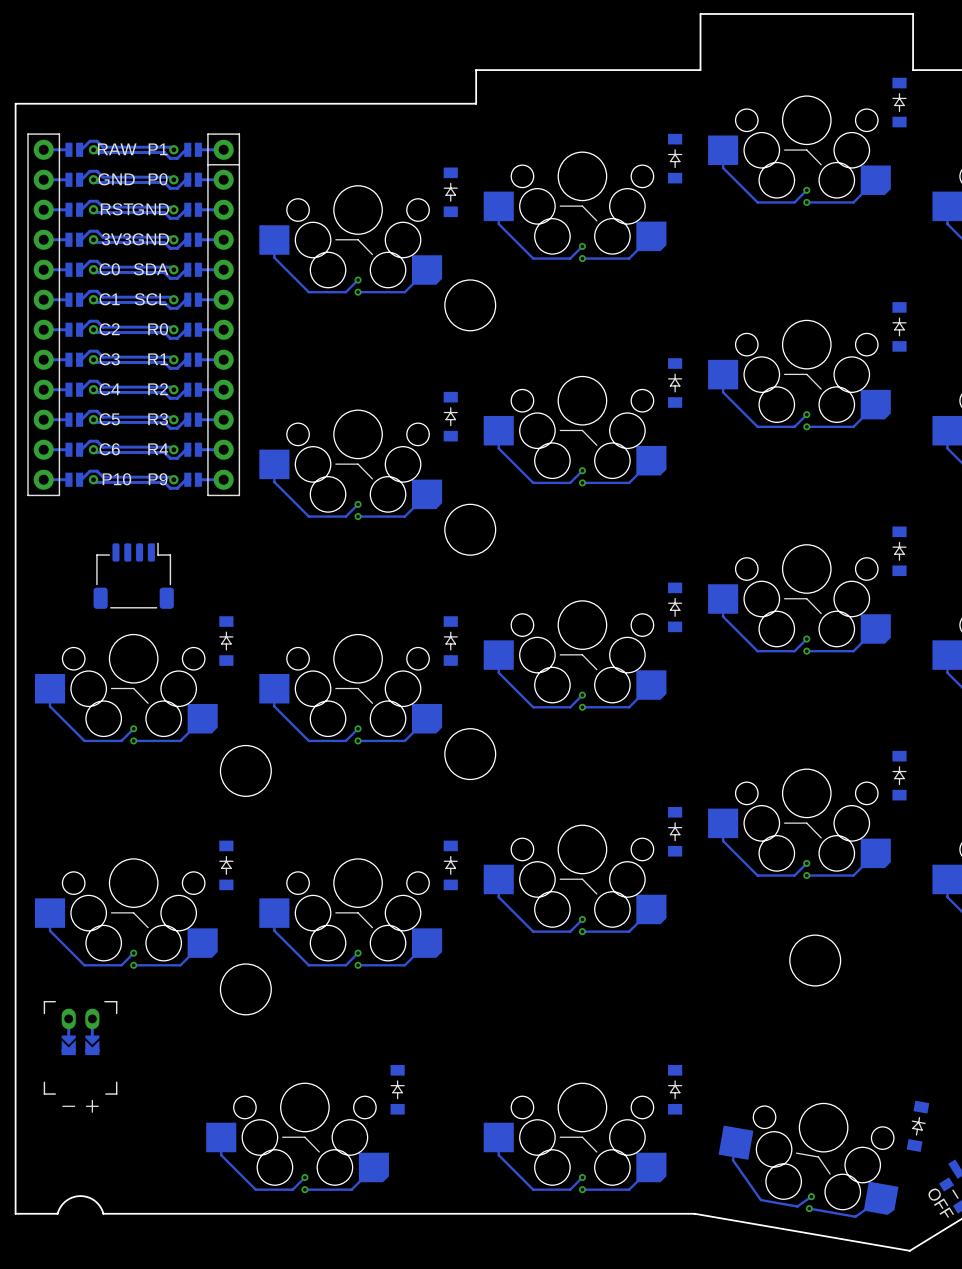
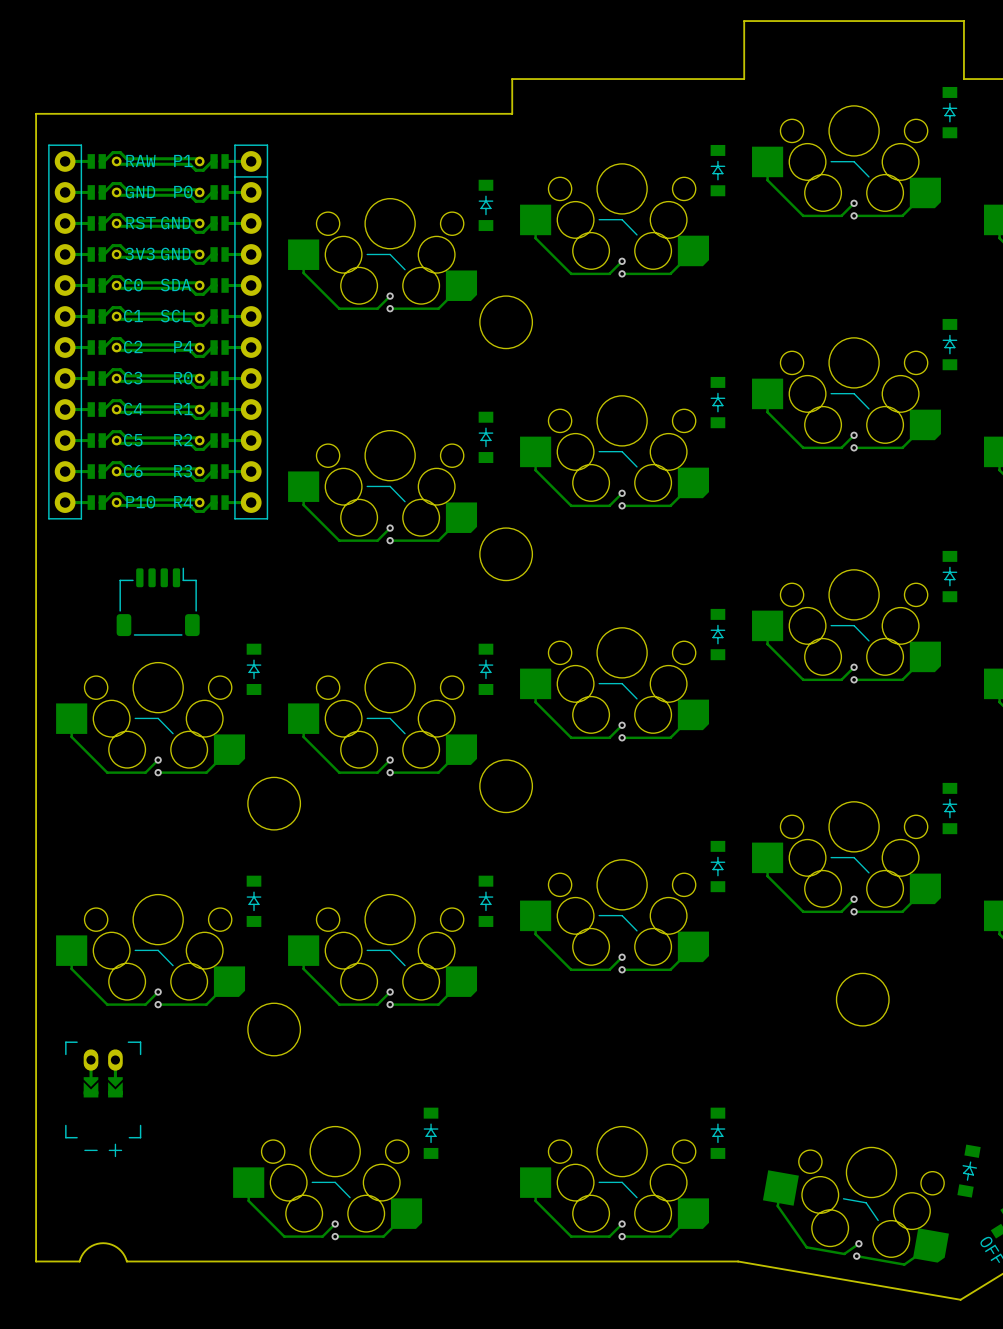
part text: R0 (158, 329) -> P4 (183, 347)
part text: R1 (158, 359) -> R0 (183, 378)
part text: R2 (158, 389) -> R1 (183, 409)
part text: R3 (158, 419) -> R2 (183, 439)
part text: R4 (158, 449) -> R3 (183, 471)
part text: P9 (158, 479) -> R4 (183, 502)

